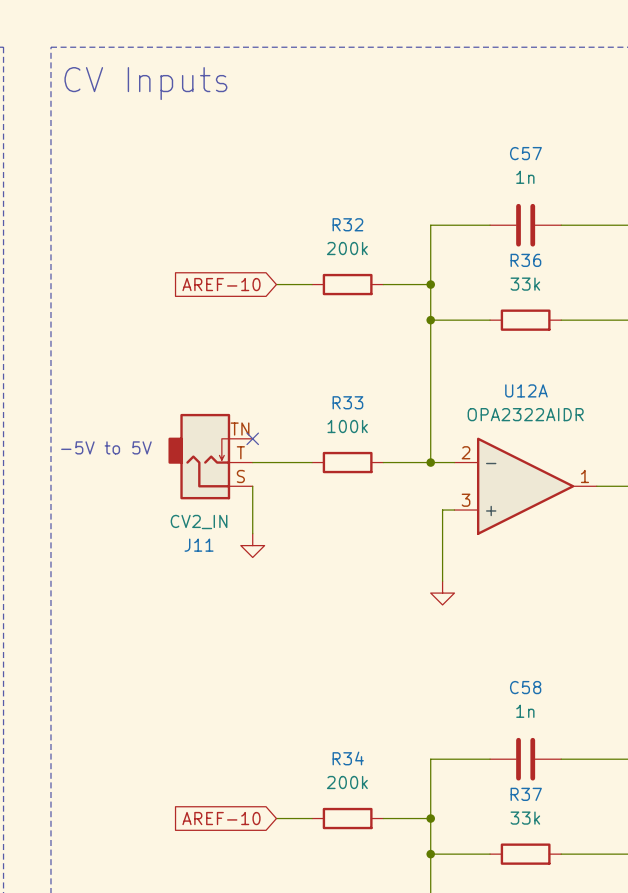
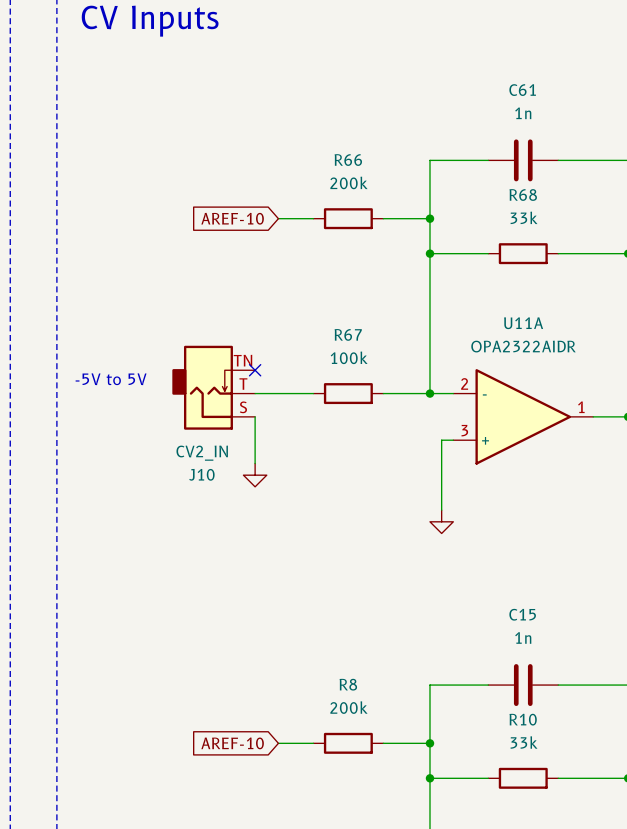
C57 name: C57 (525, 153) -> C61 (522, 90)
R32 name: R32 (347, 224) -> R66 (348, 160)
R36 name: R36 (525, 260) -> R68 (523, 195)
U12A name: U12A (526, 390) -> U11A (523, 323)
R33 name: R33 (347, 402) -> R67 (348, 334)
J11 name: J11 (199, 545) -> J10 (201, 474)
C58 name: C58 (525, 687) -> C15 (522, 614)
R34 name: R34 (348, 758) -> R8 (348, 684)
R37 name: R37 (526, 794) -> R10 (523, 719)

